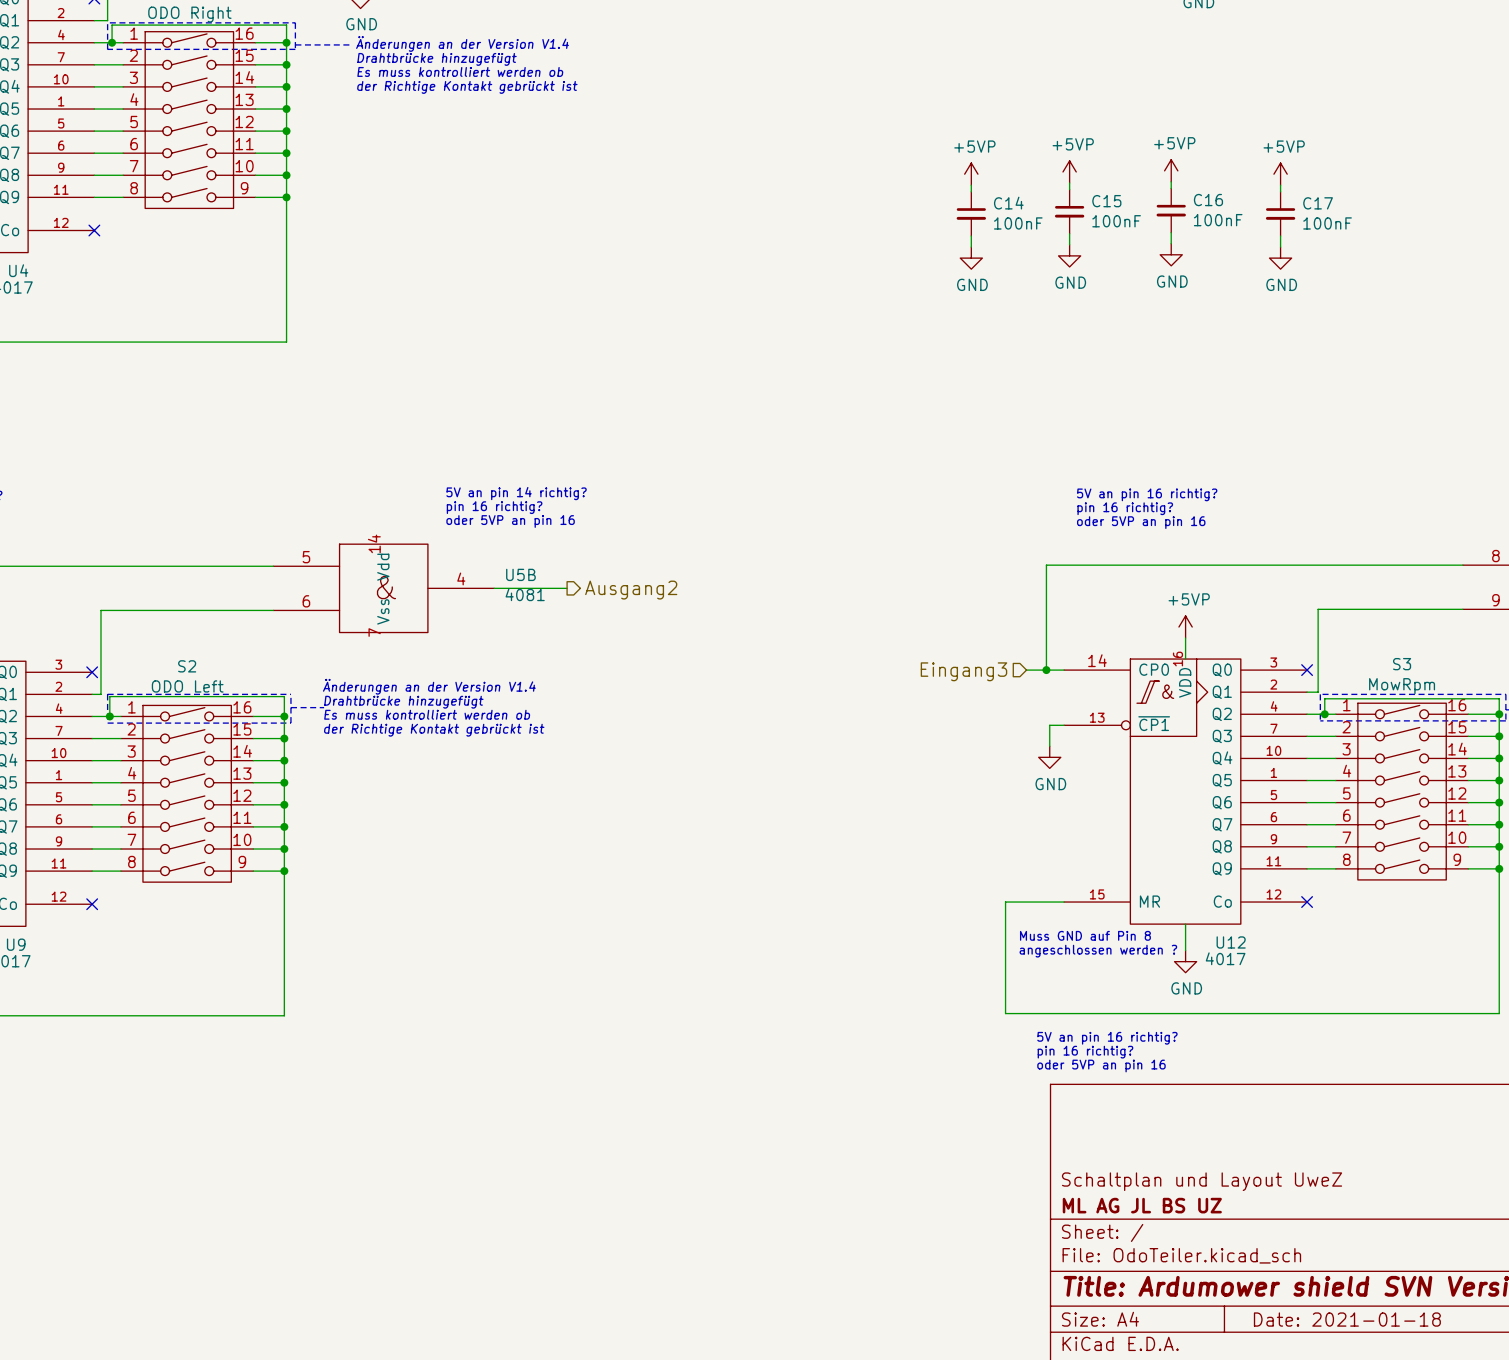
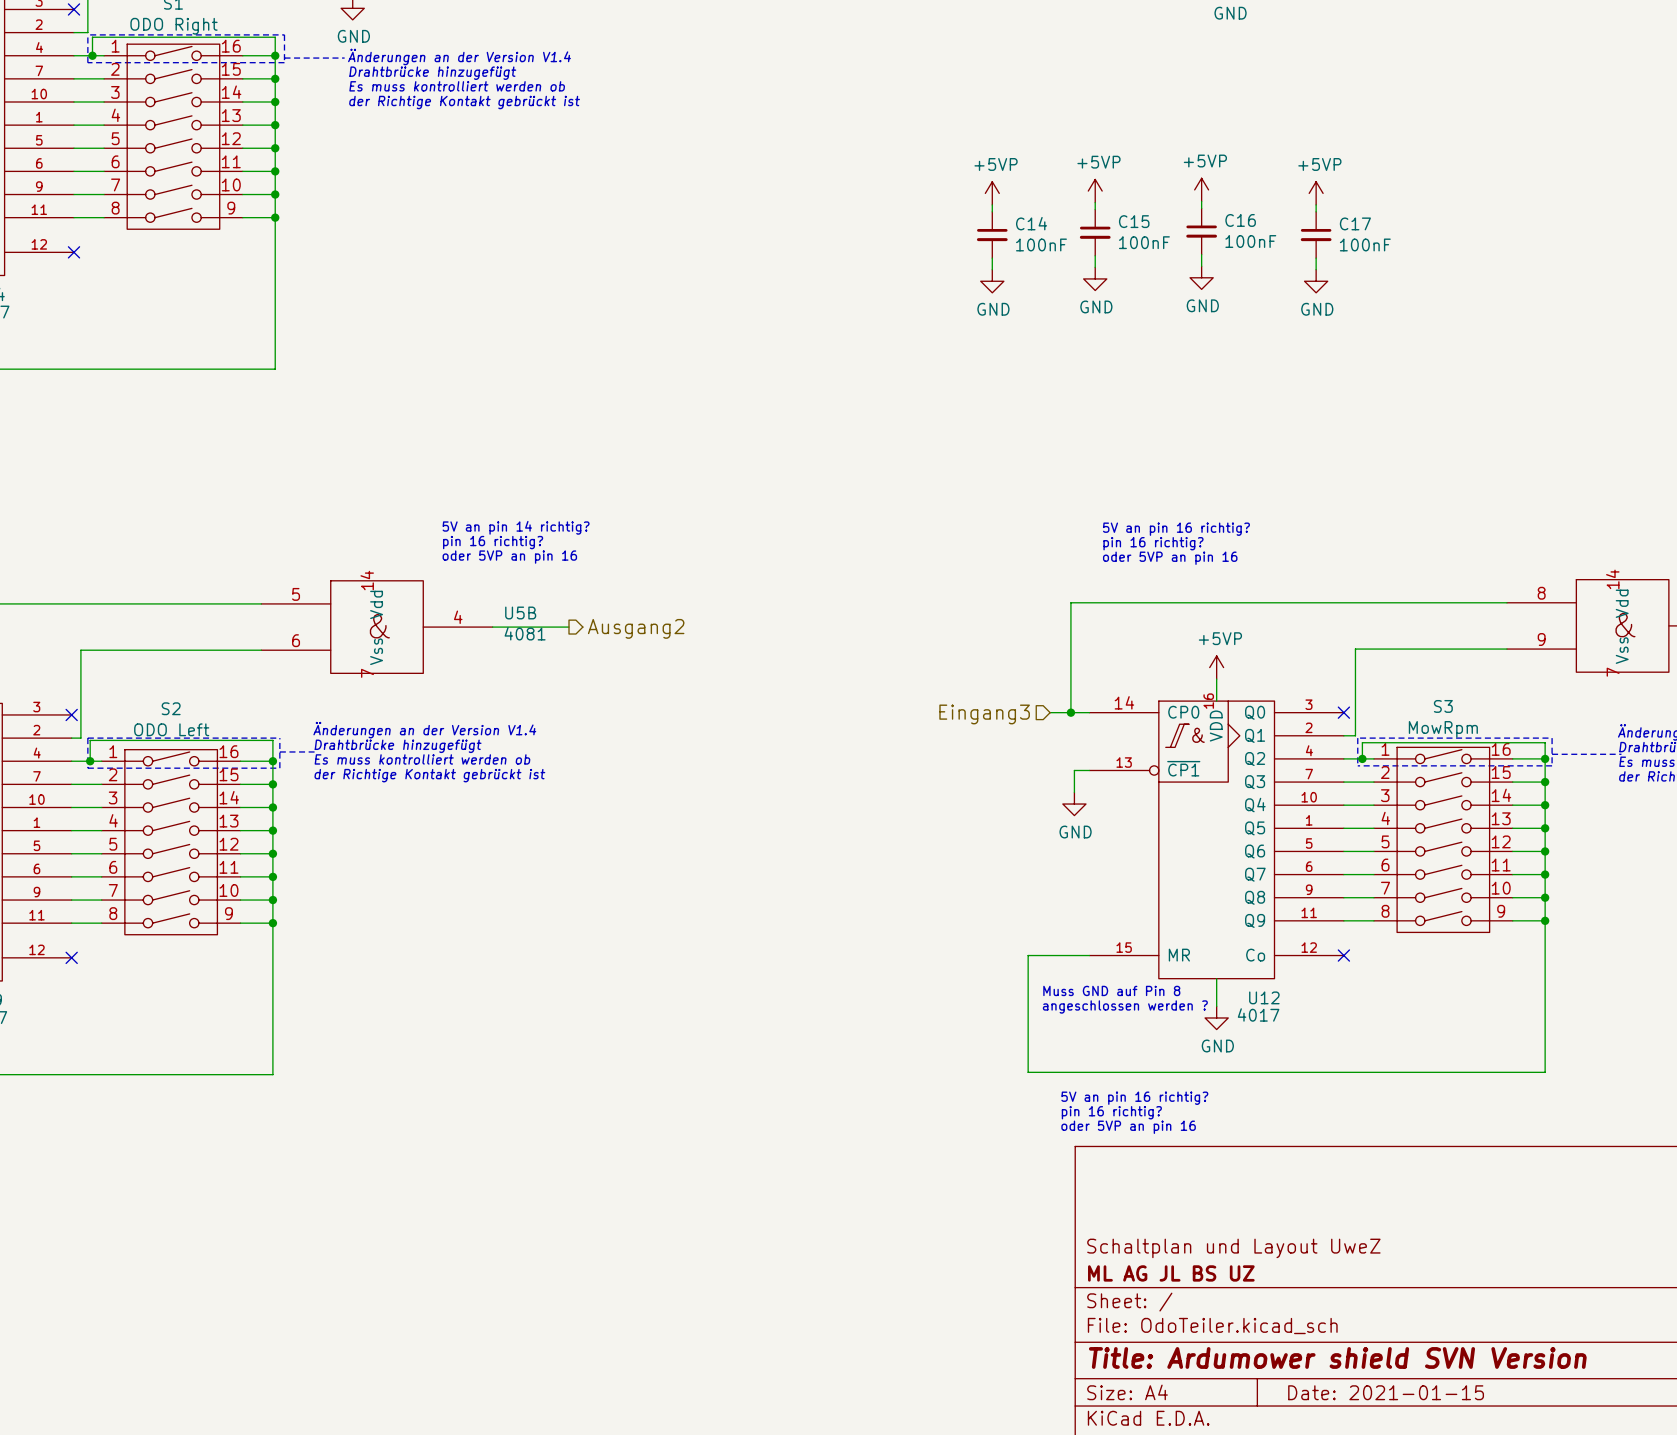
title block: Date: 2021-01-18 (1347, 1319) -> Date: 2021-01-15 (1386, 1392)

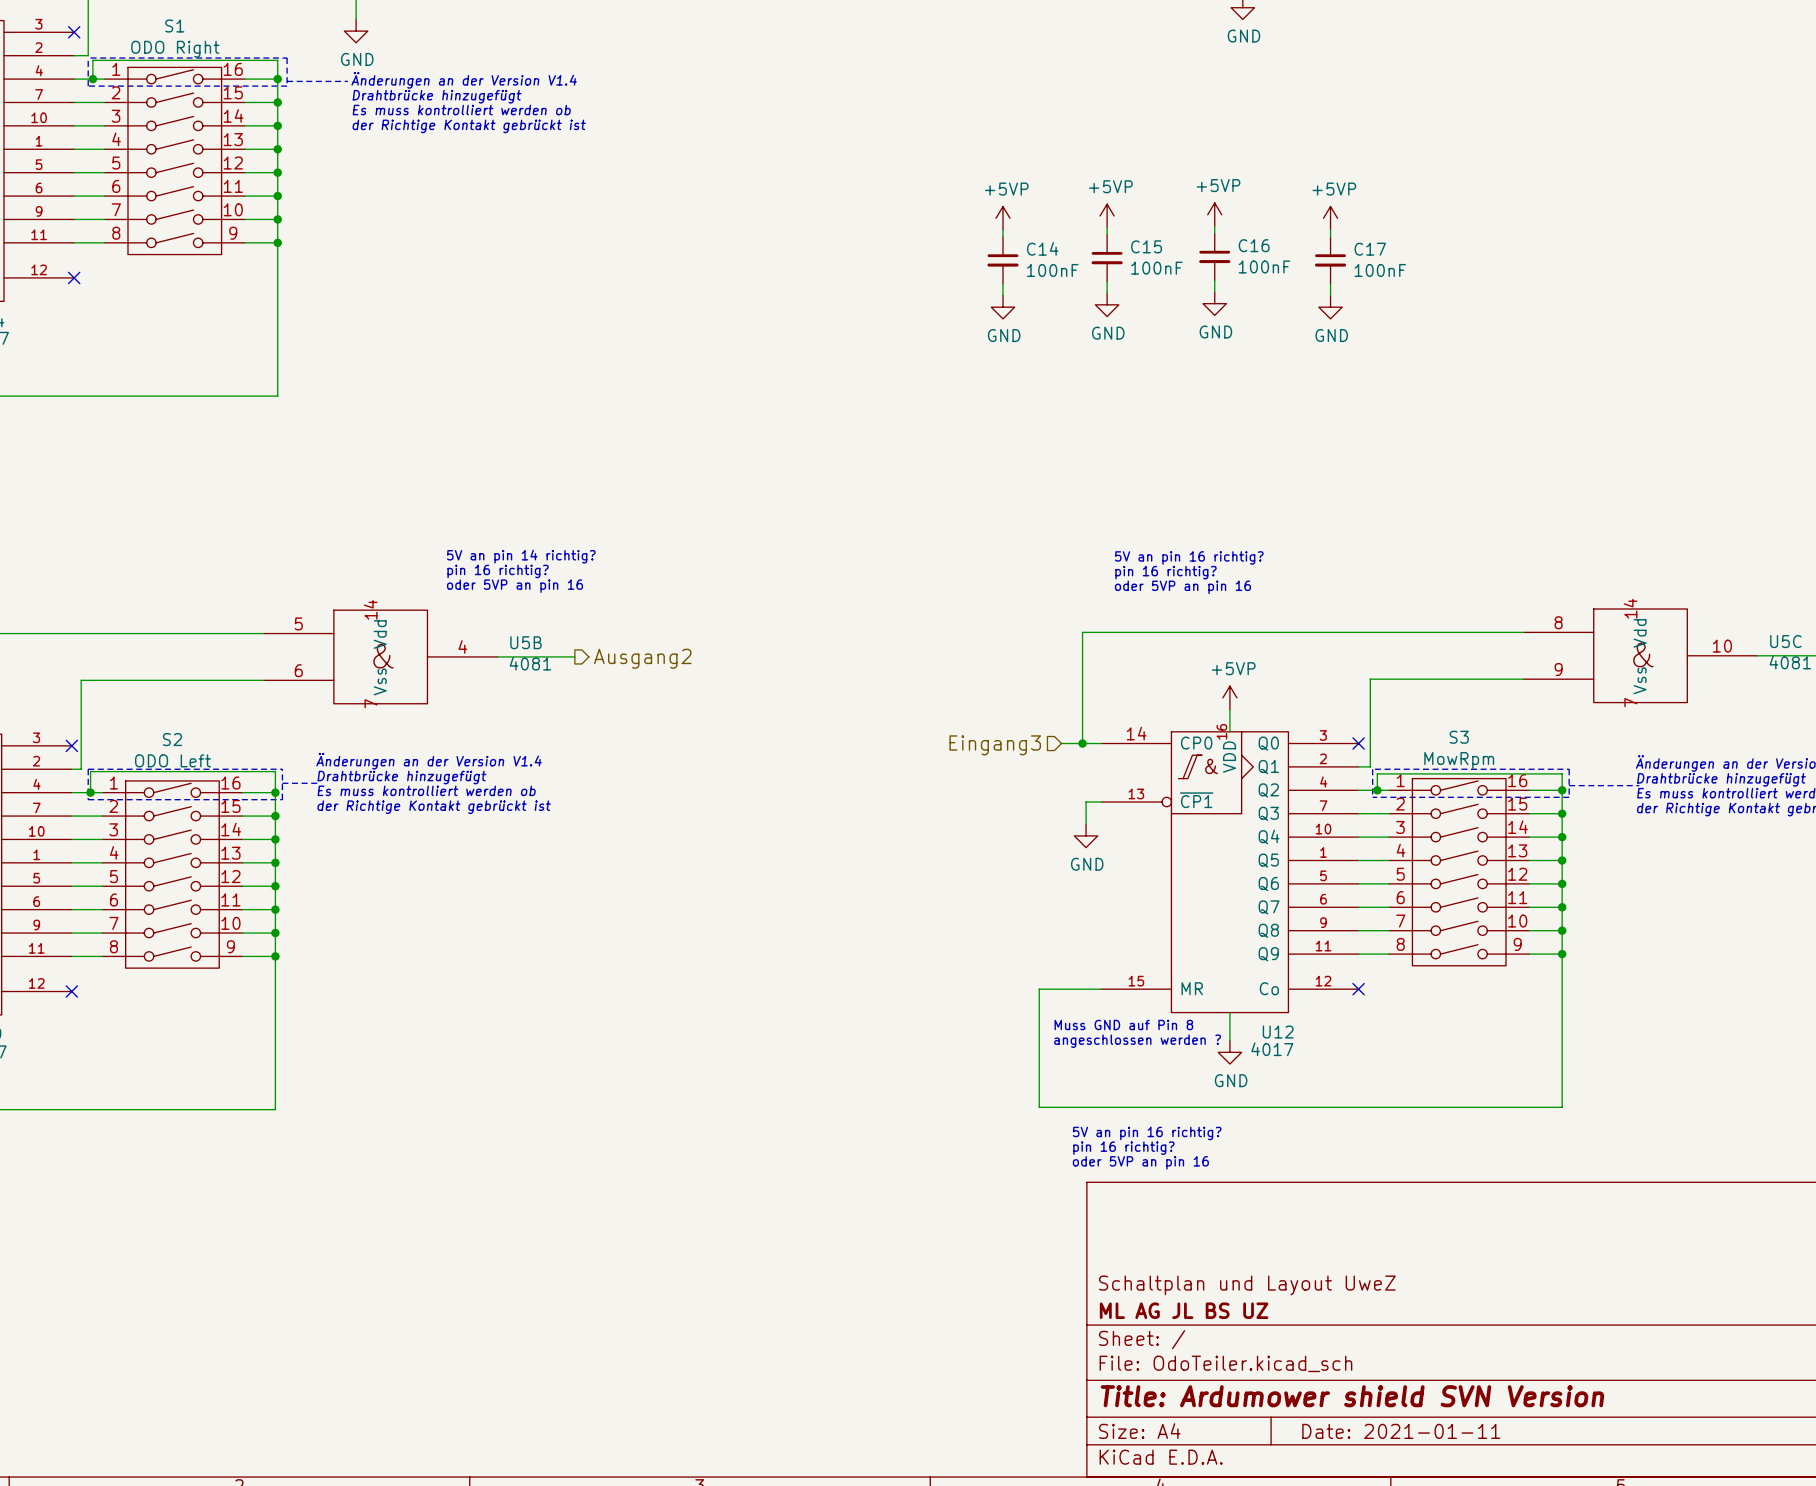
title block: Date: 2021-01-15 (1386, 1392) -> Date: 2021-01-11 (1401, 1431)

